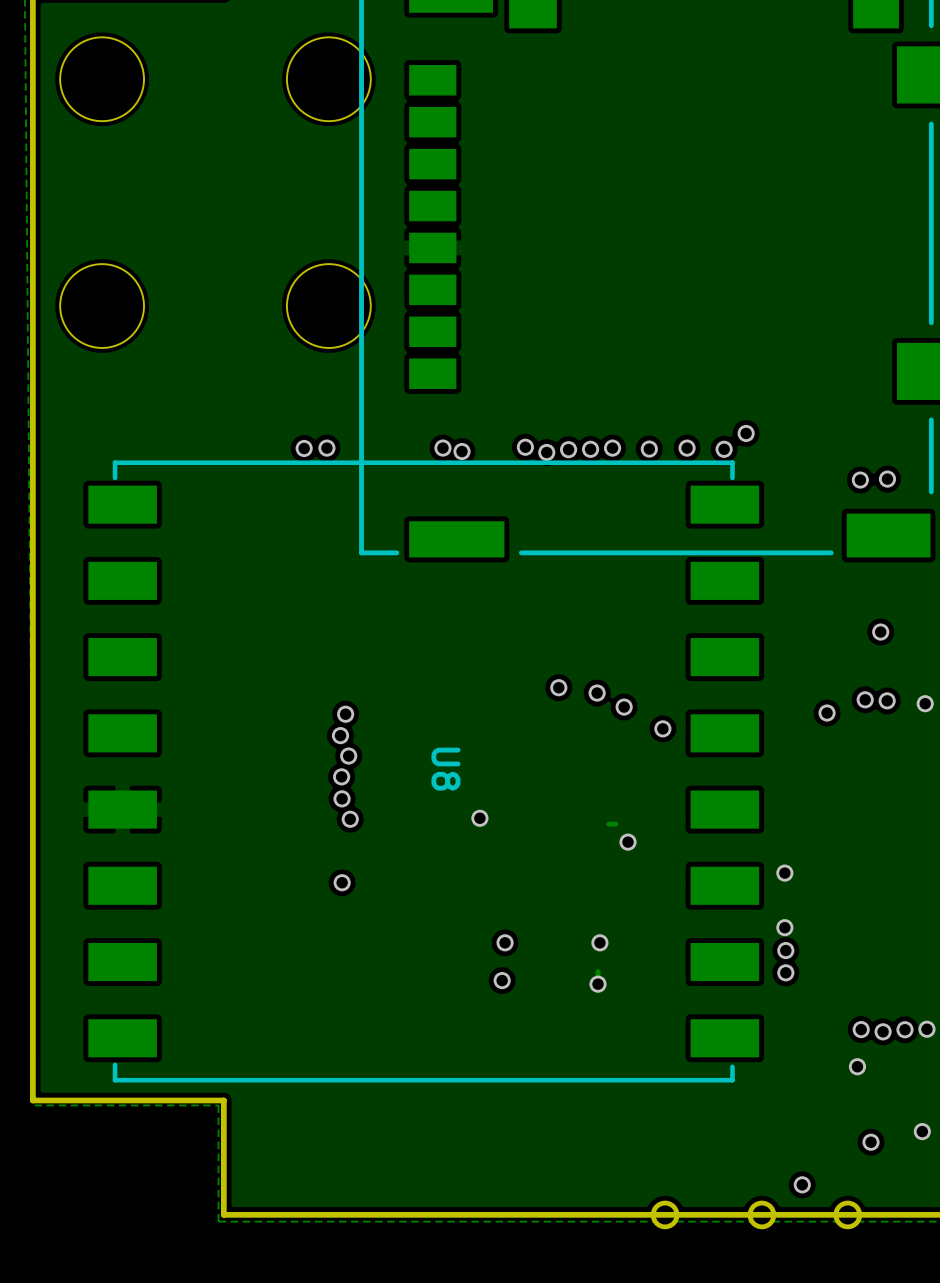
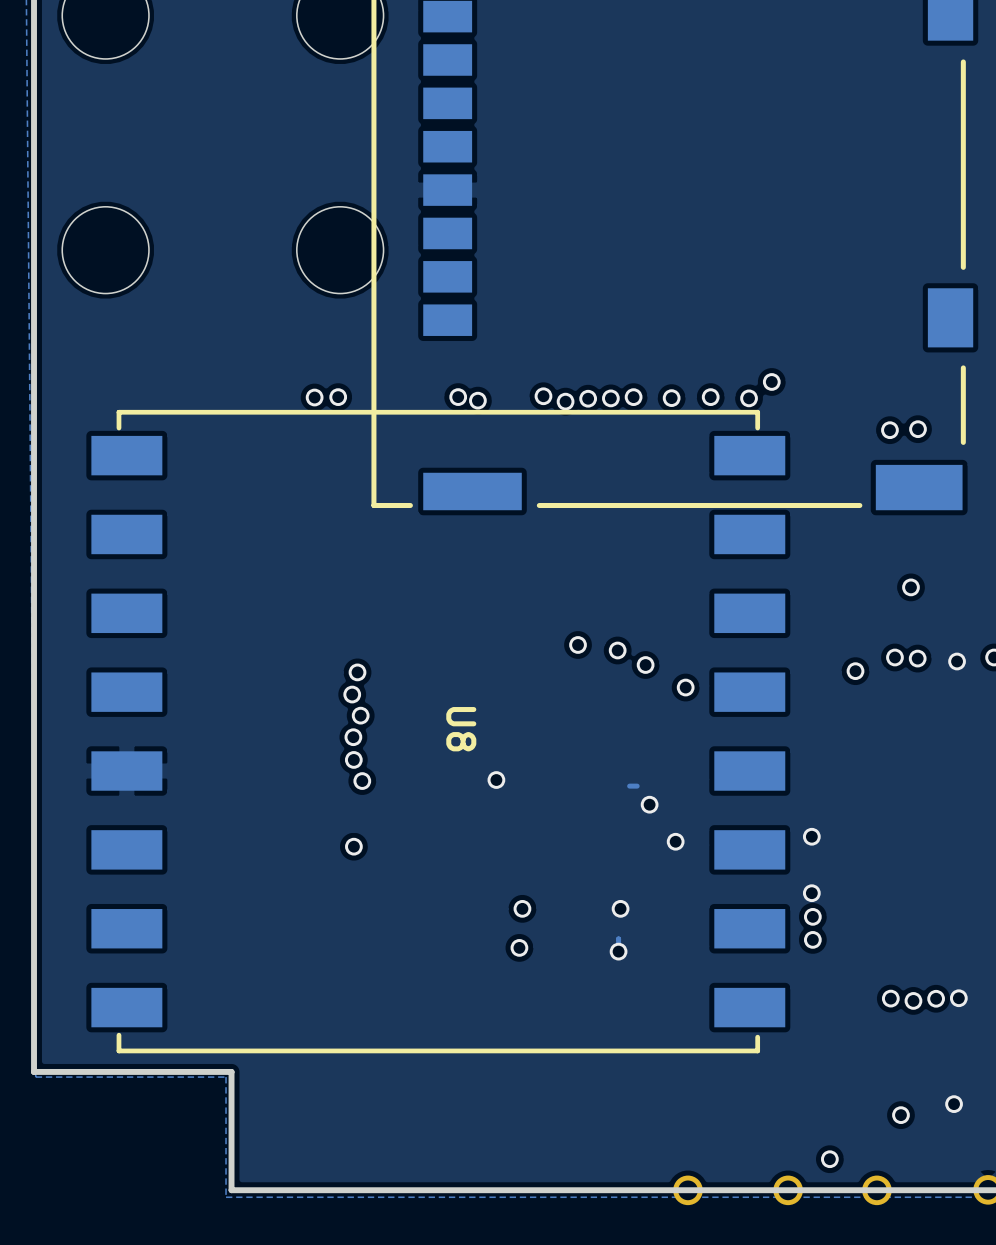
via: none -> (675, 841)
via: (857, 1066) -> none

